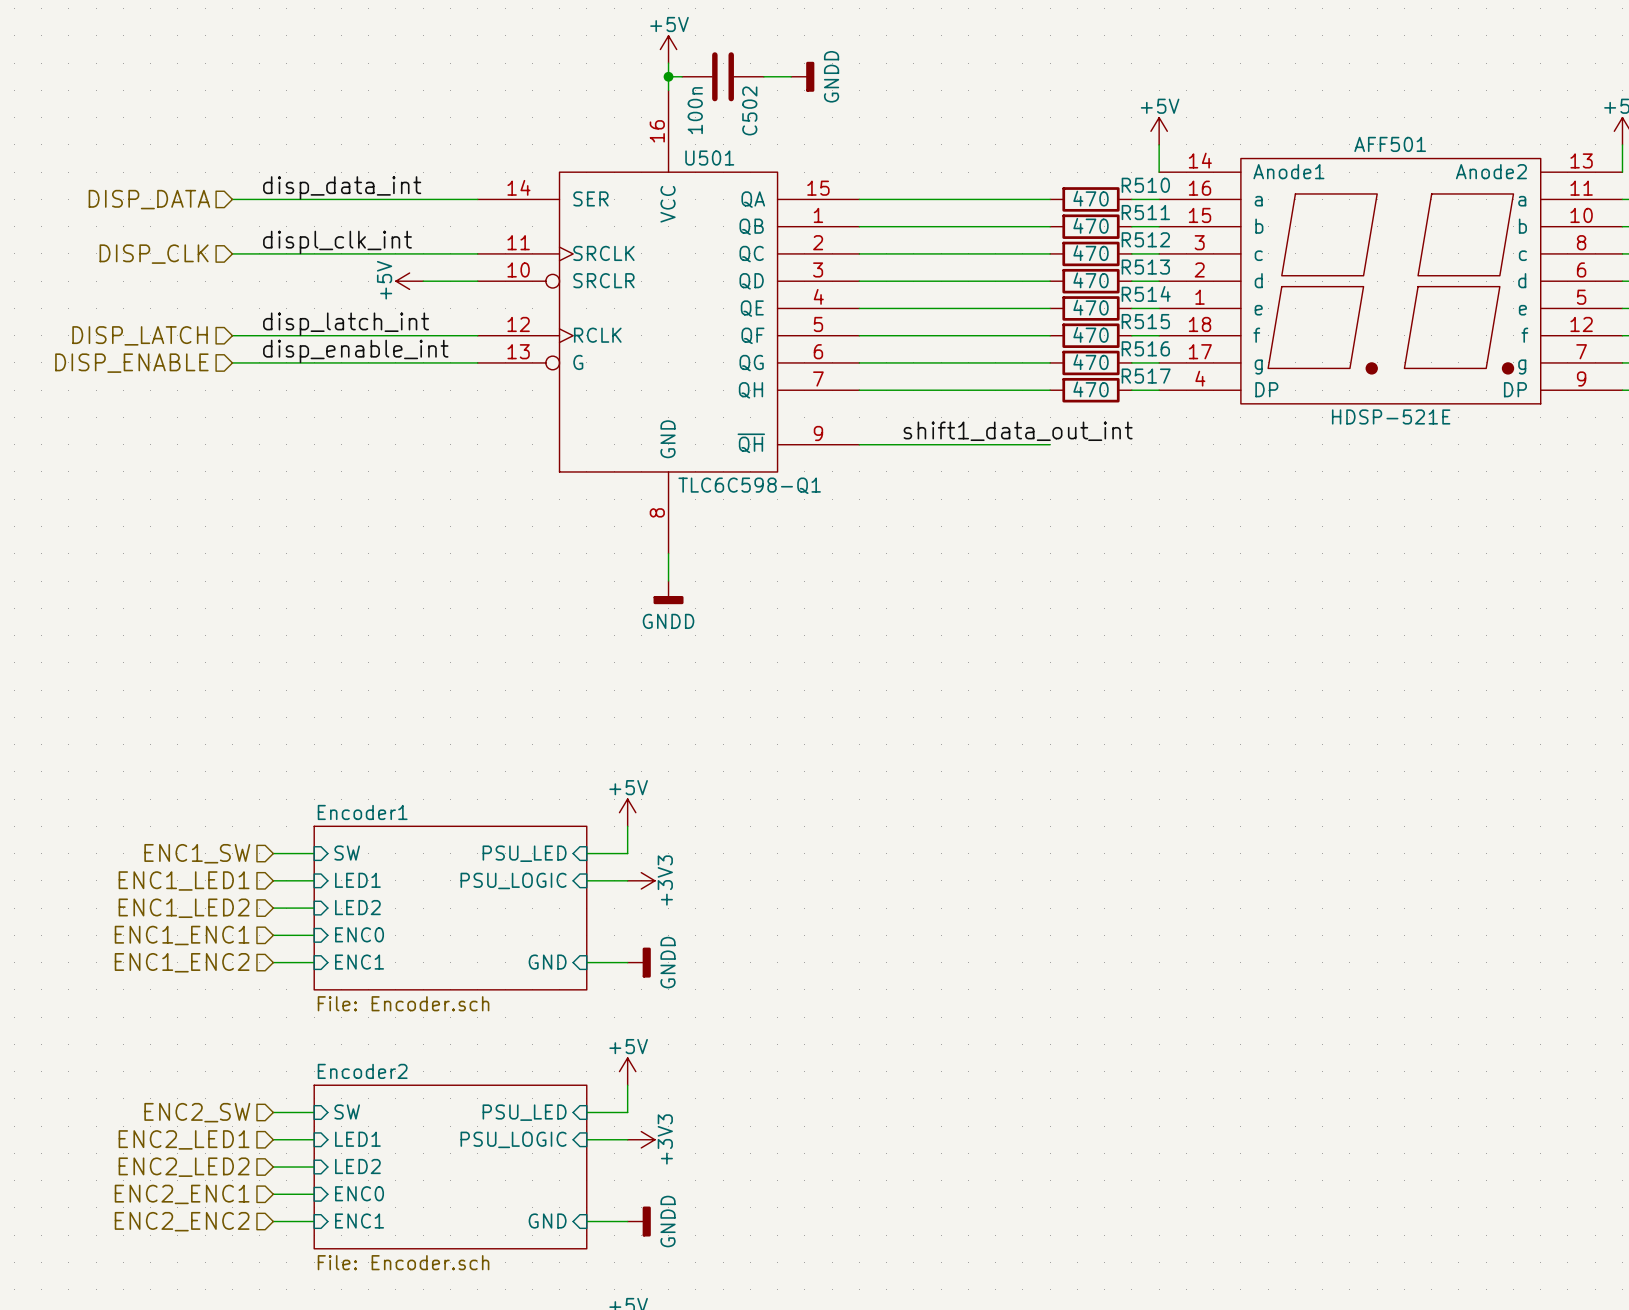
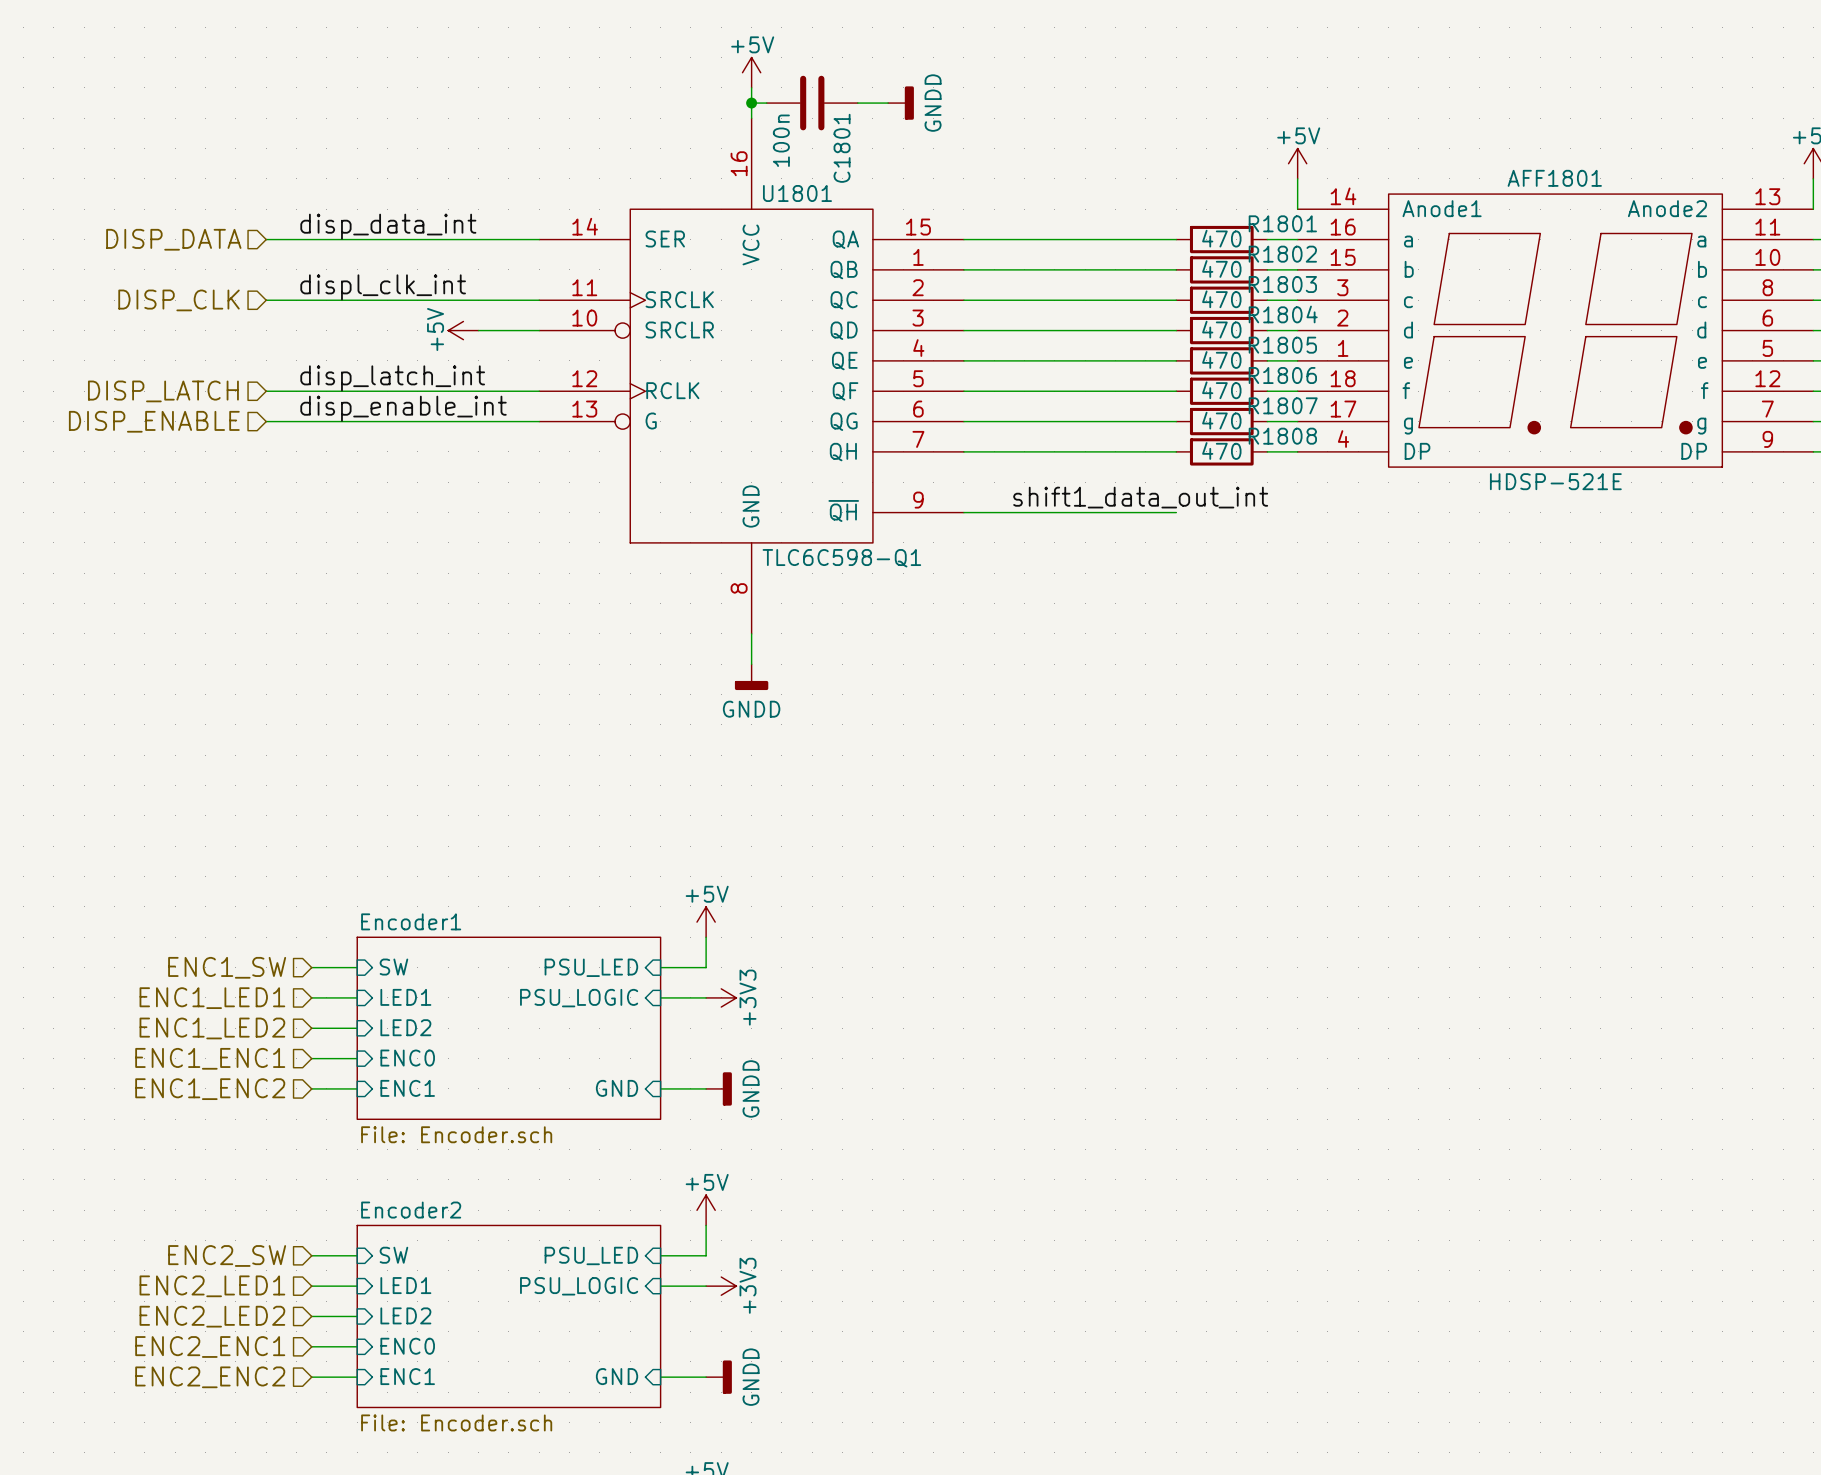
C502 name: C502 (749, 110) -> C1801 (842, 148)
AFF501 name: AFF501 (1390, 144) -> AFF1801 (1554, 178)
U501 name: U501 (709, 158) -> U1801 (797, 193)
R510 name: R510 (1145, 185) -> R1801 (1282, 223)
R511 name: R511 (1145, 212) -> R1802 (1282, 254)
R512 name: R512 (1145, 239) -> R1803 (1282, 284)
R513 name: R513 (1145, 267) -> R1804 (1283, 314)
R514 name: R514 (1146, 293) -> R1805 (1282, 345)
R515 name: R515 (1145, 321) -> R1806 (1282, 375)
R516 name: R516 (1145, 348) -> R1807 (1283, 405)
R517 name: R517 (1146, 376) -> R1808 (1282, 436)

